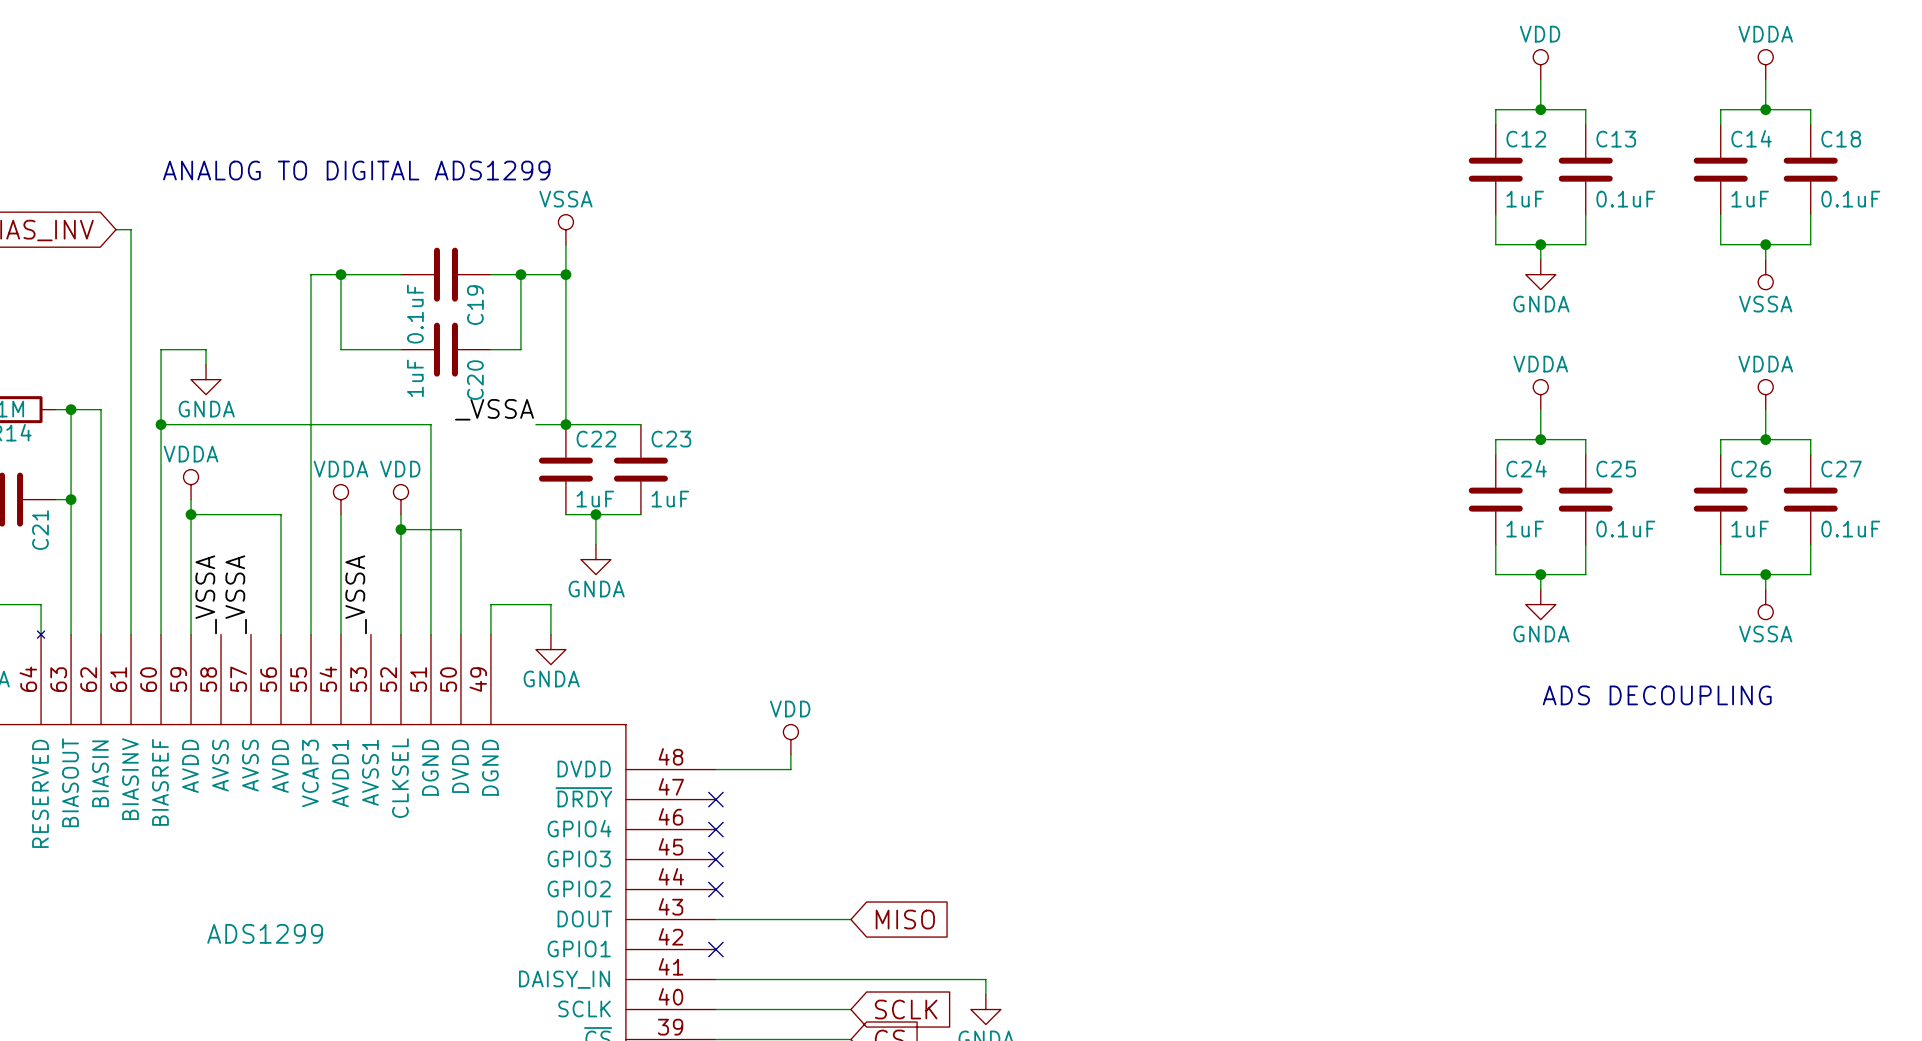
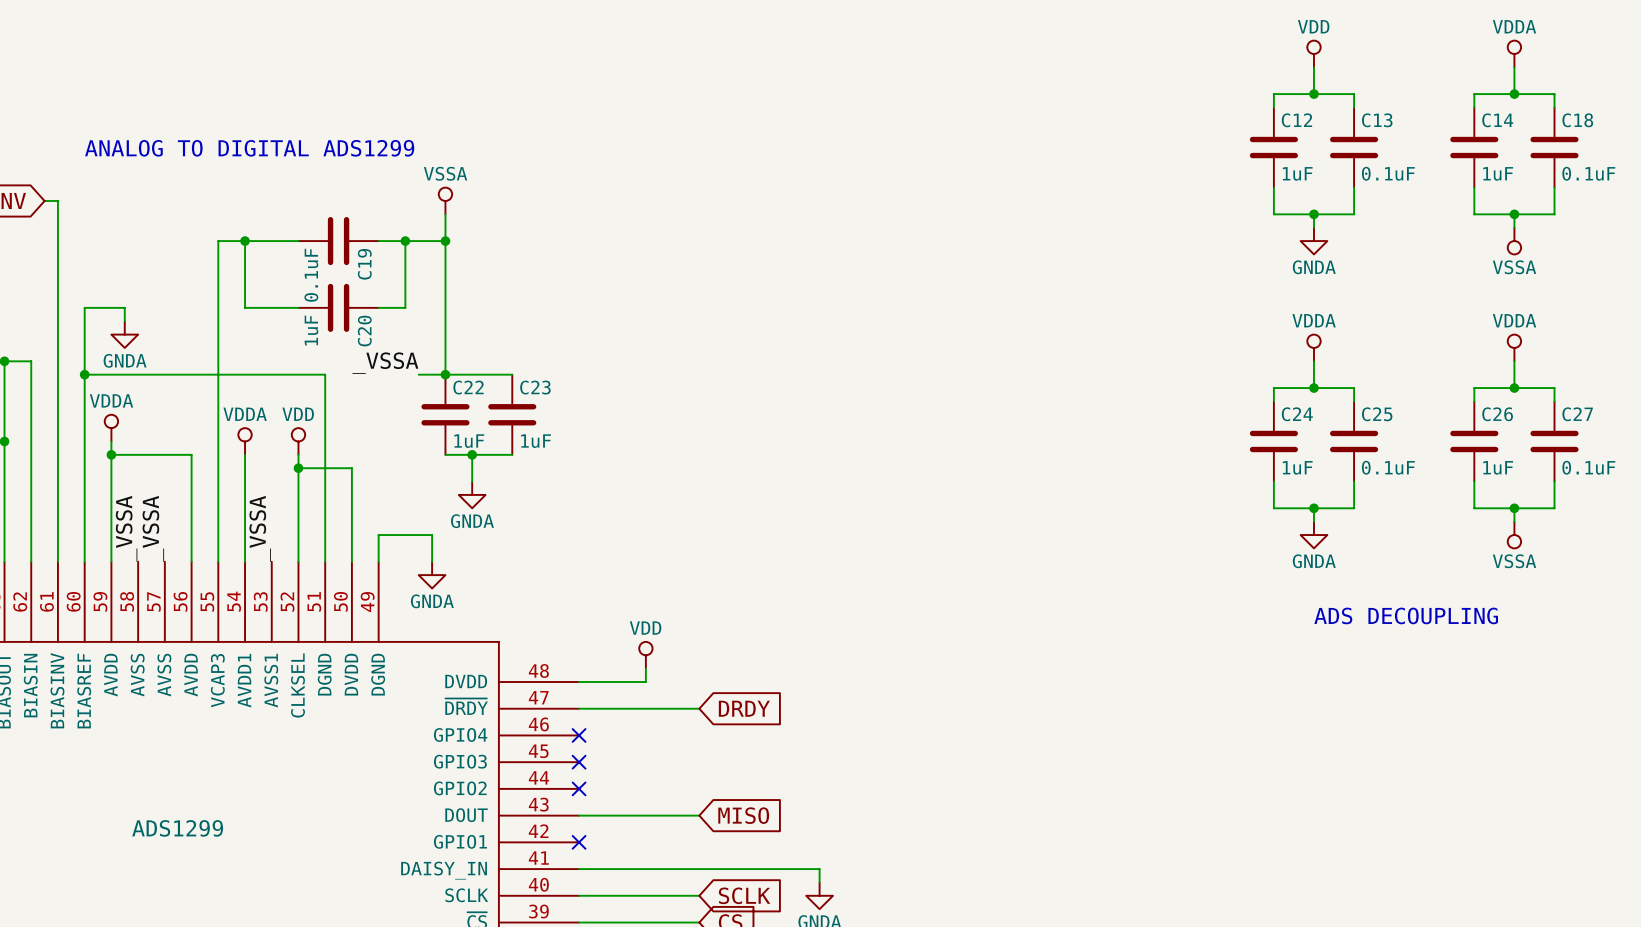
wire: none -> (579, 708) (699, 708)
no-connect mark: (715, 799) -> none
global label: none -> DRDY (744, 708)

